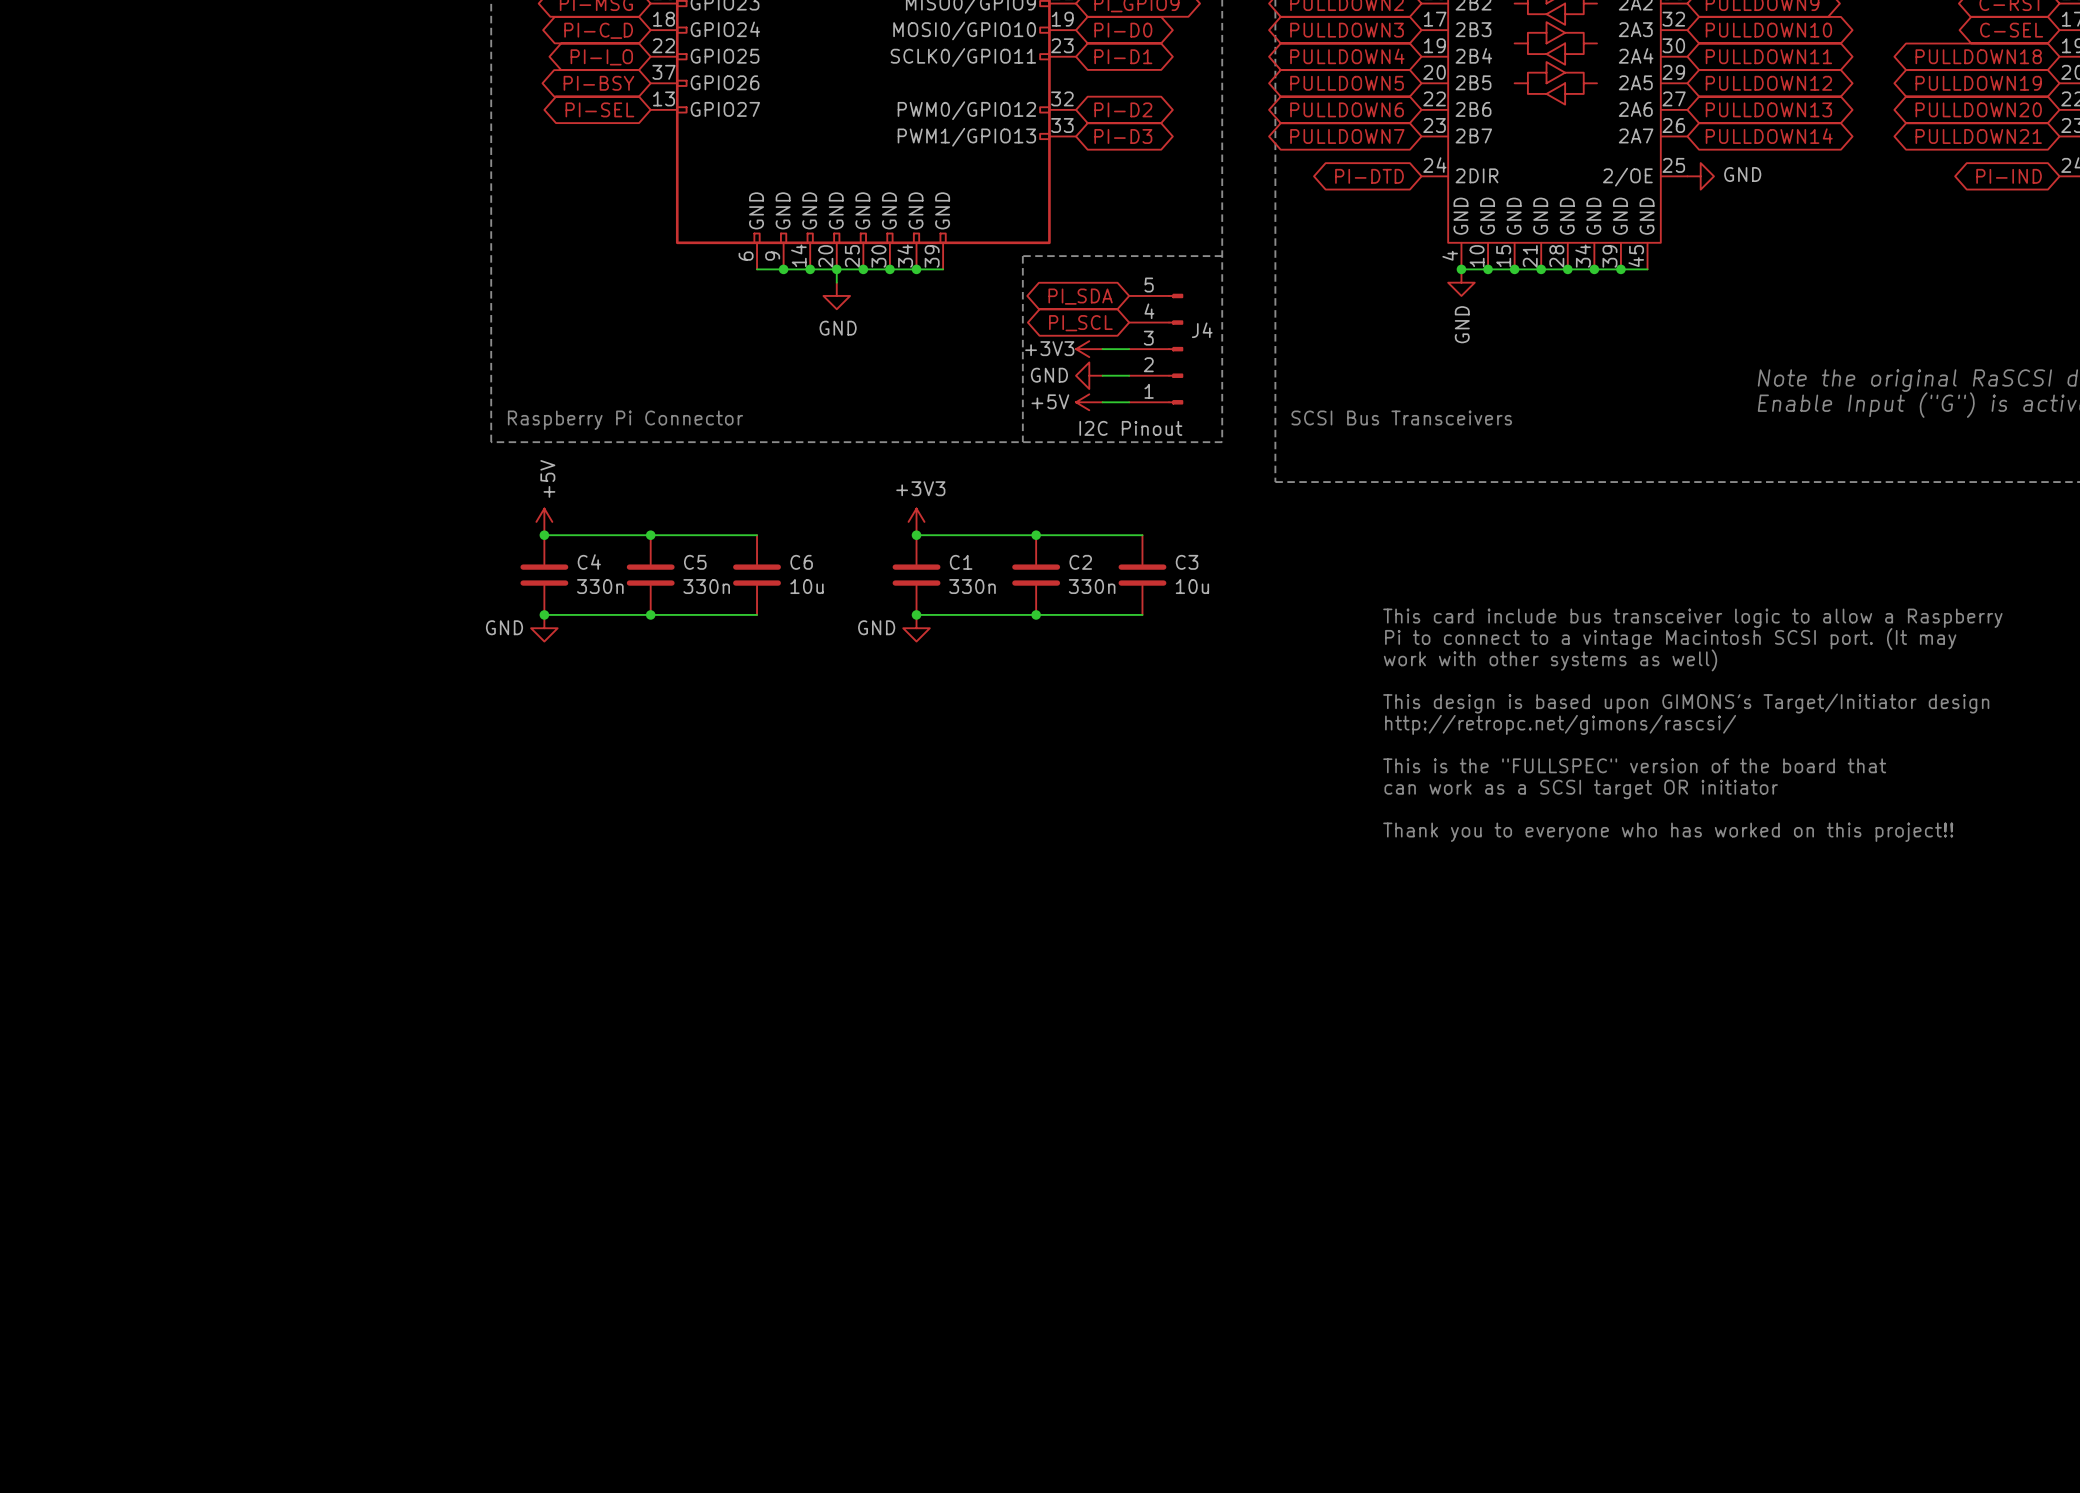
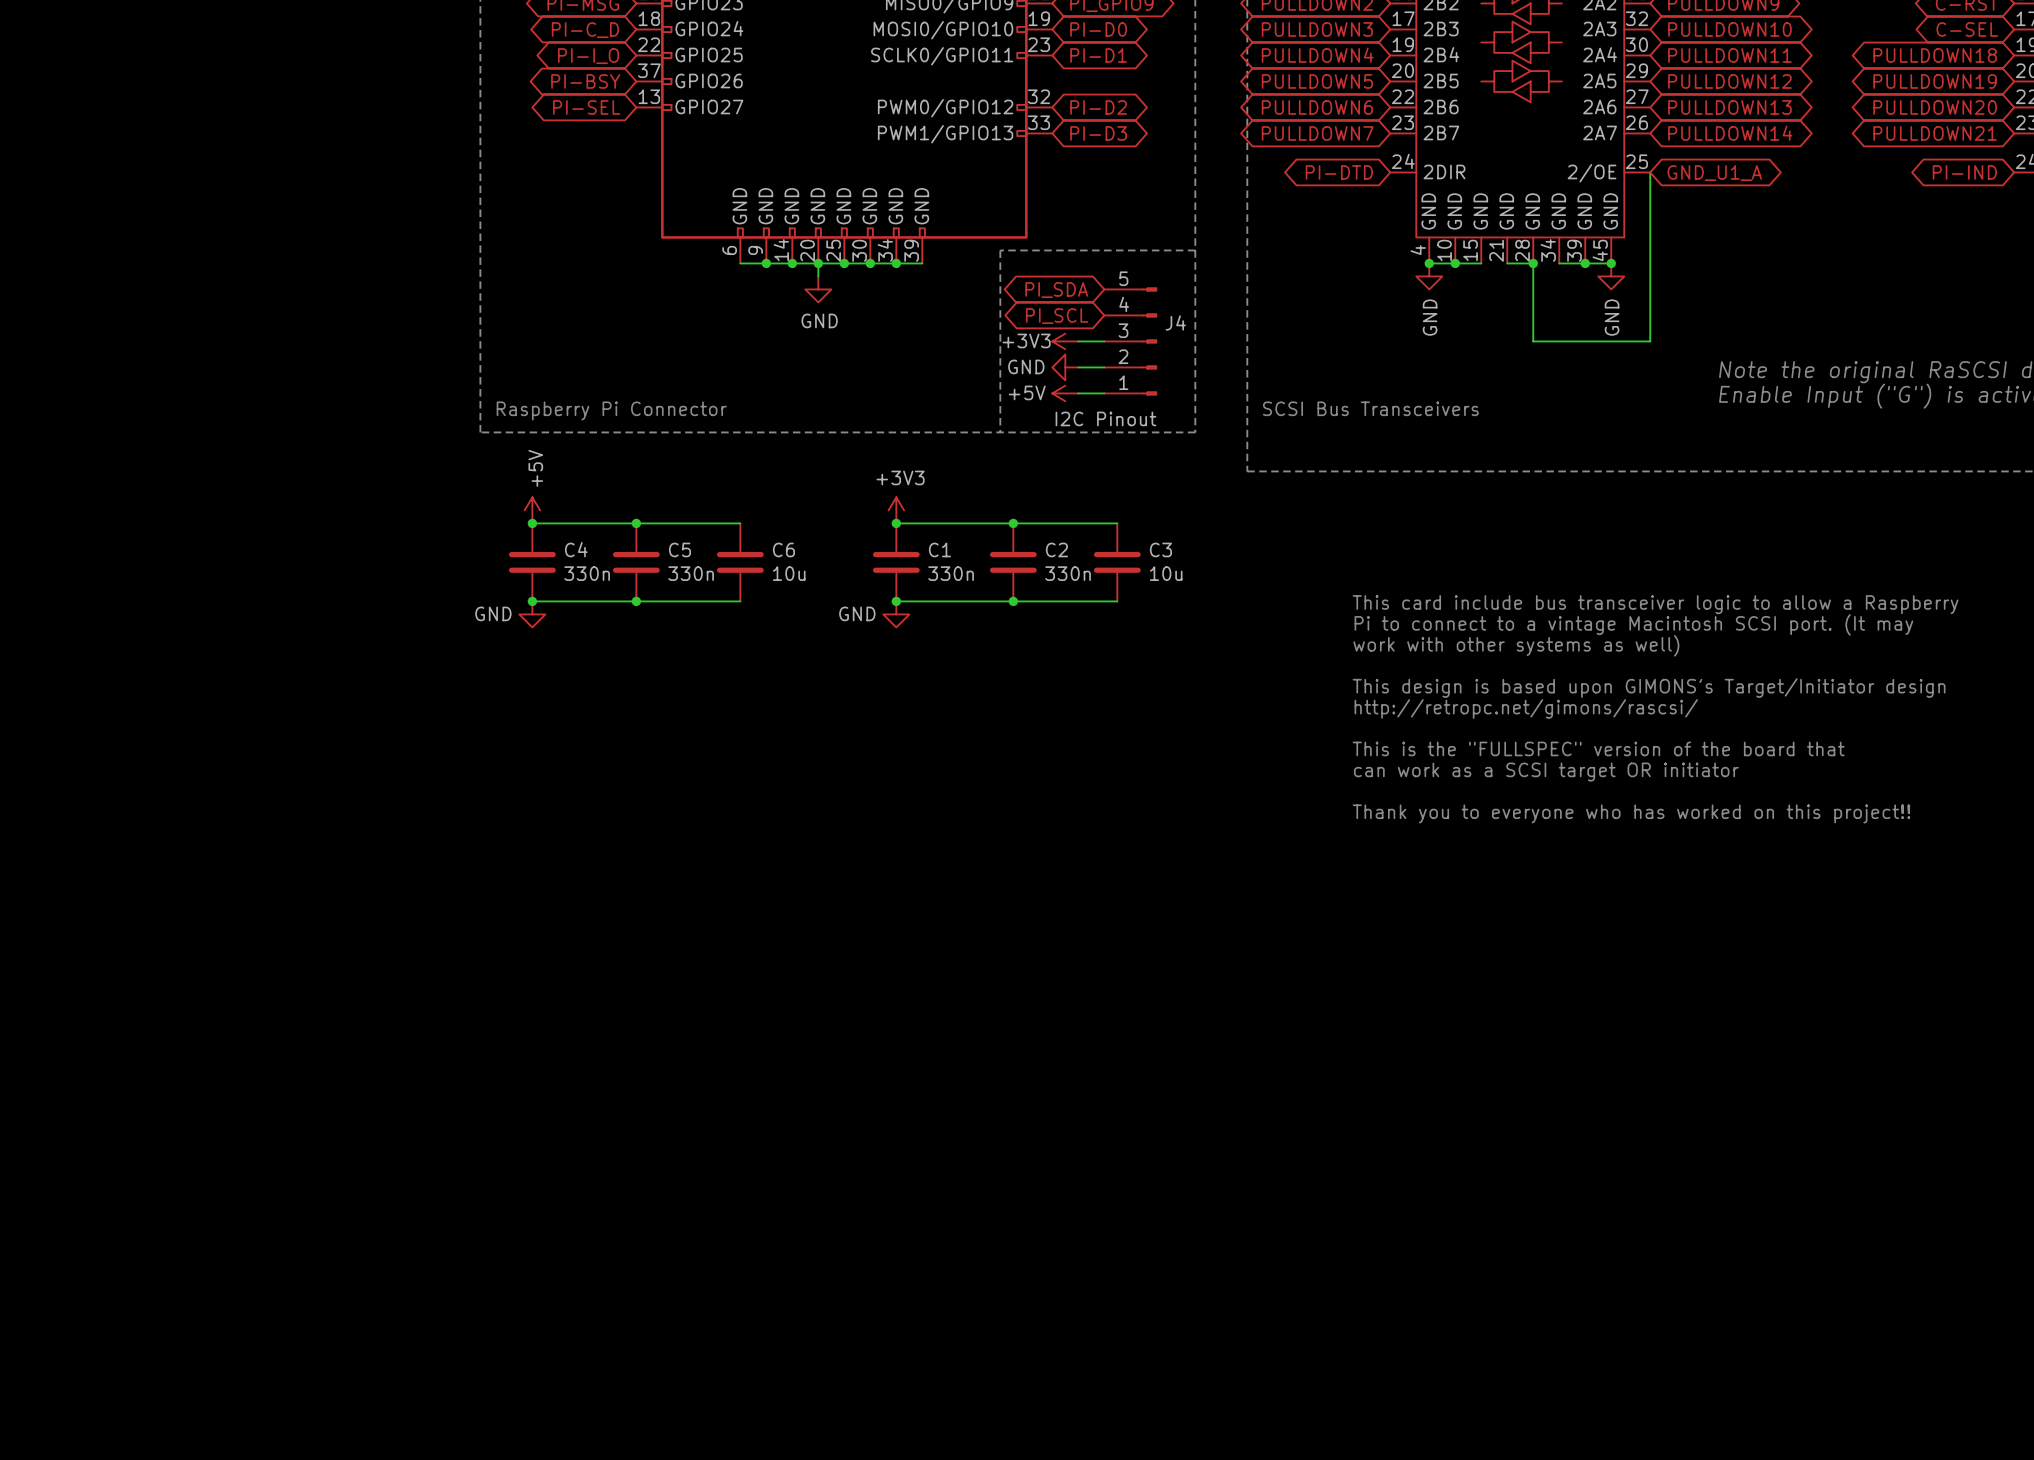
power symbol rotation: 0° (1700, 176) -> 90° clockwise (1611, 276)
power symbol position: GND (1700, 176) -> GND (1611, 276)
global label: none -> GND_U1_A (1714, 173)
wire: (1514, 269) (1541, 269) -> none
junction: (1514, 269) -> none
junction: (1541, 269) -> none
wire: (1567, 269) (1594, 269) -> (1533, 263) (1533, 341) (1650, 341) (1650, 172)
junction: (1594, 269) -> none
junction: none -> (1611, 263)

